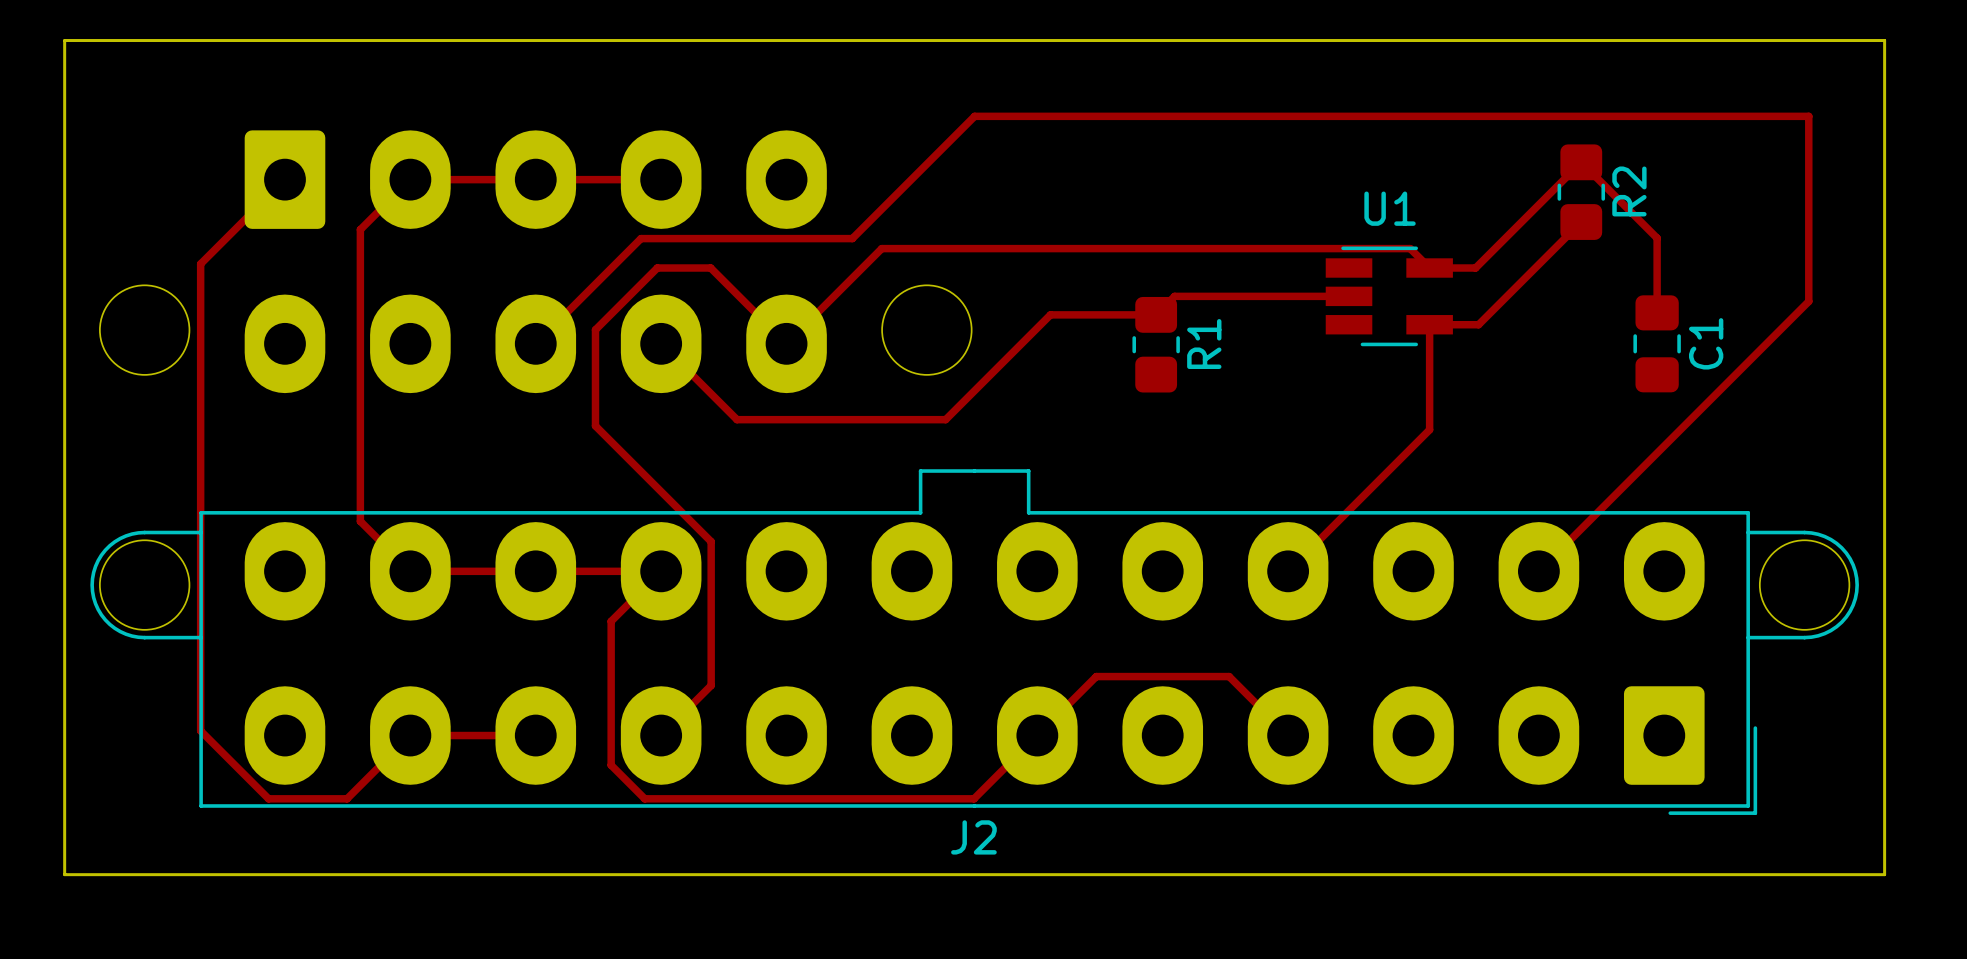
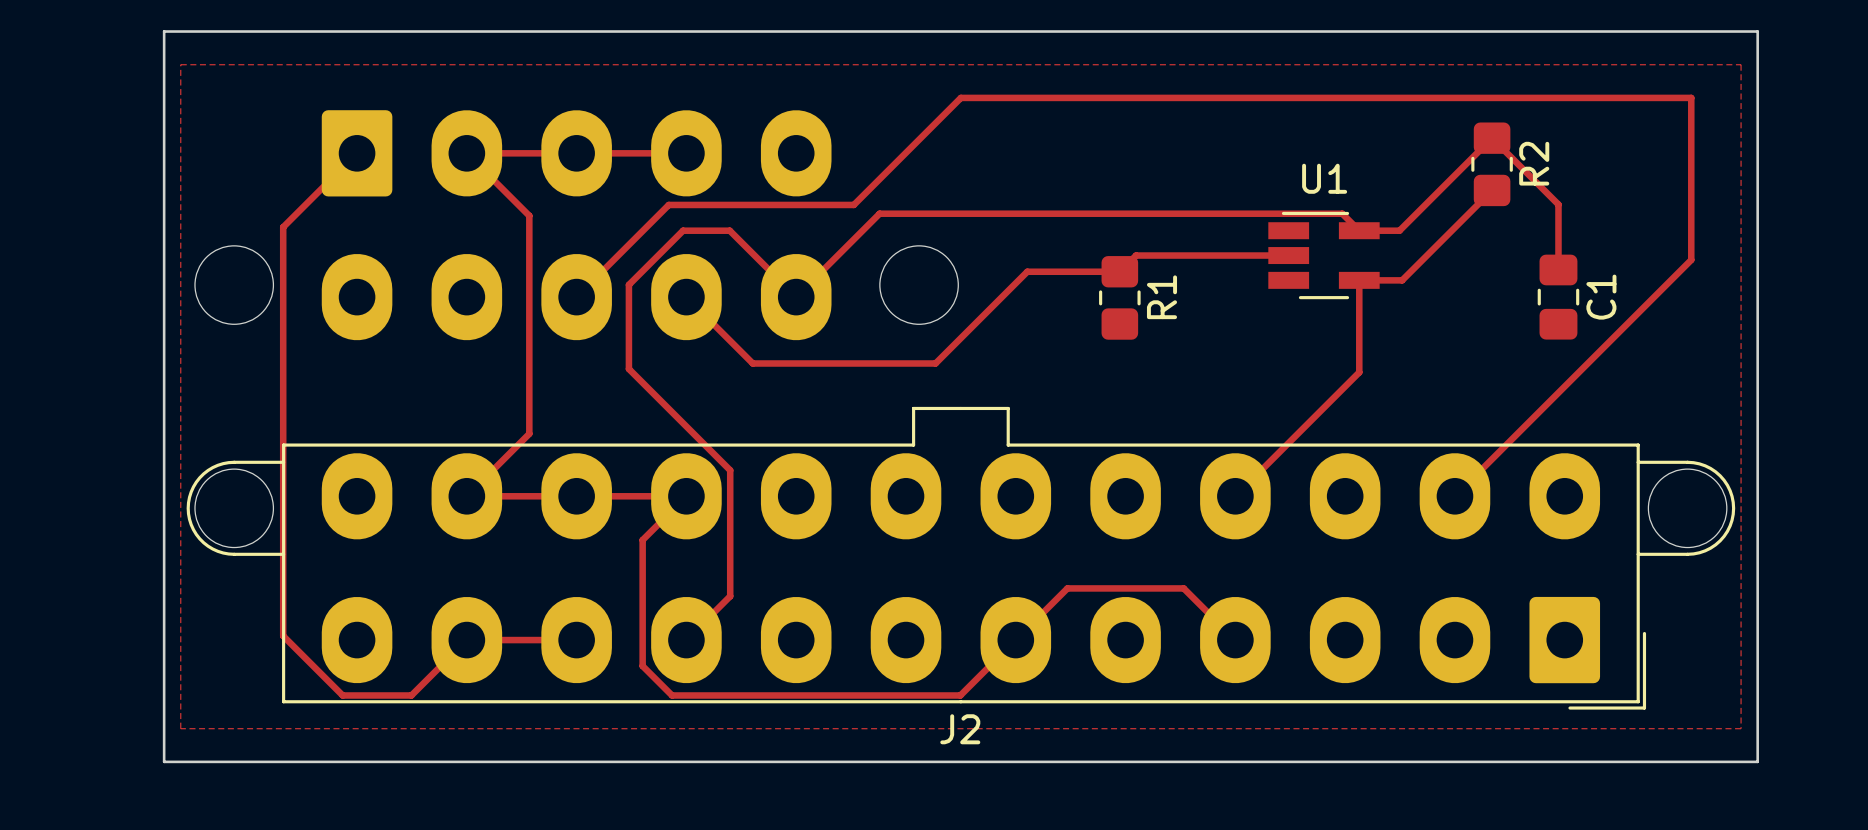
top zone outline: none -> (180, 64) (1741, 64) (1741, 728) (180, 728) (180, 64)
top track: (410, 179) (360, 229) (360, 521) (410, 571) -> (466, 153) (529, 215) (529, 433) (466, 496)

